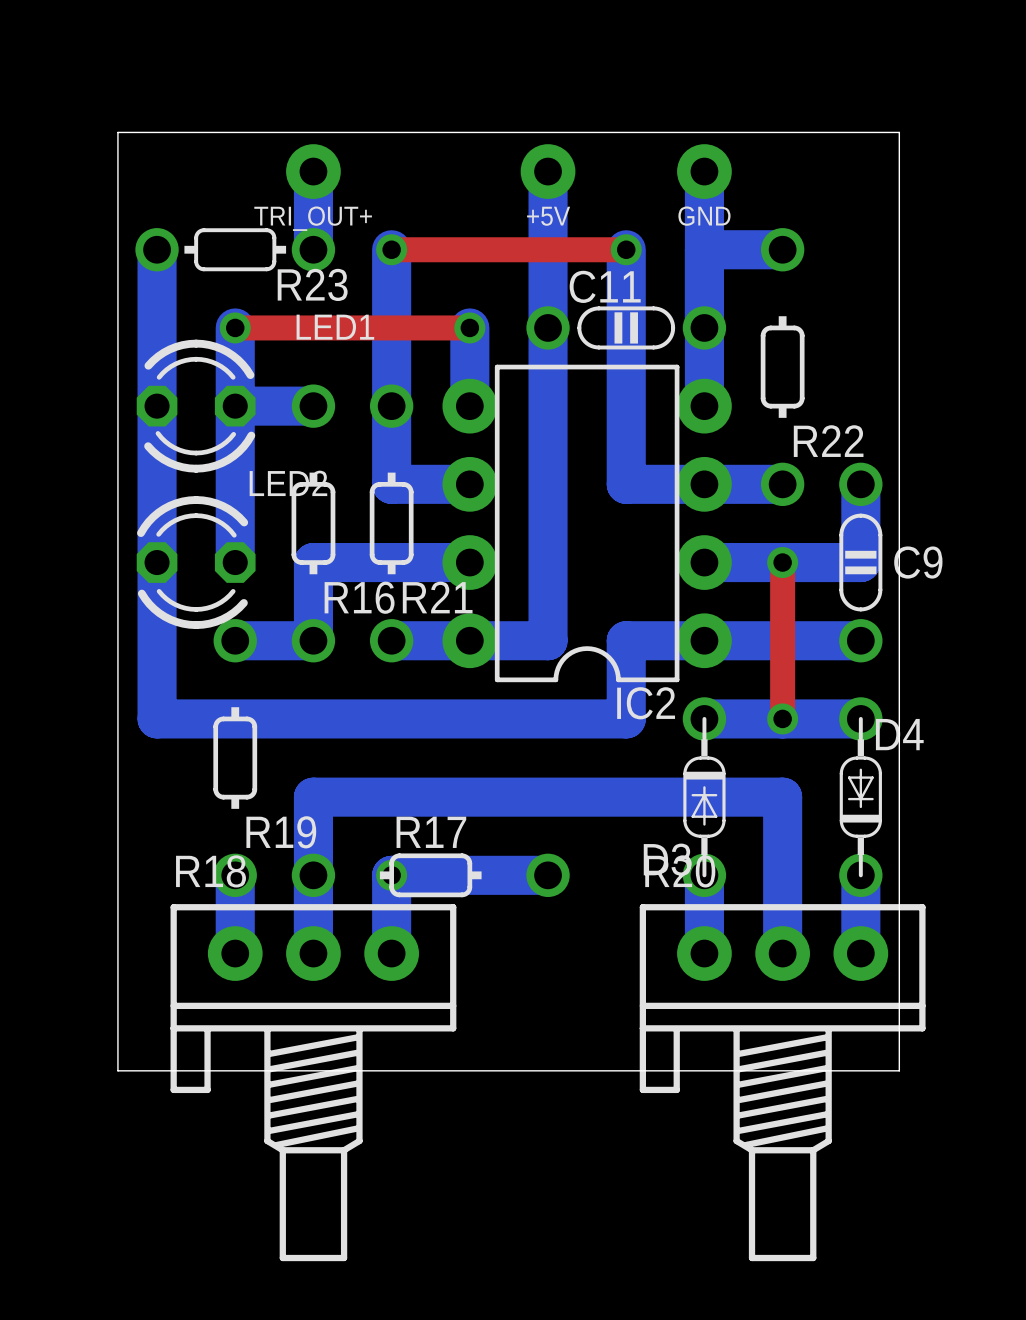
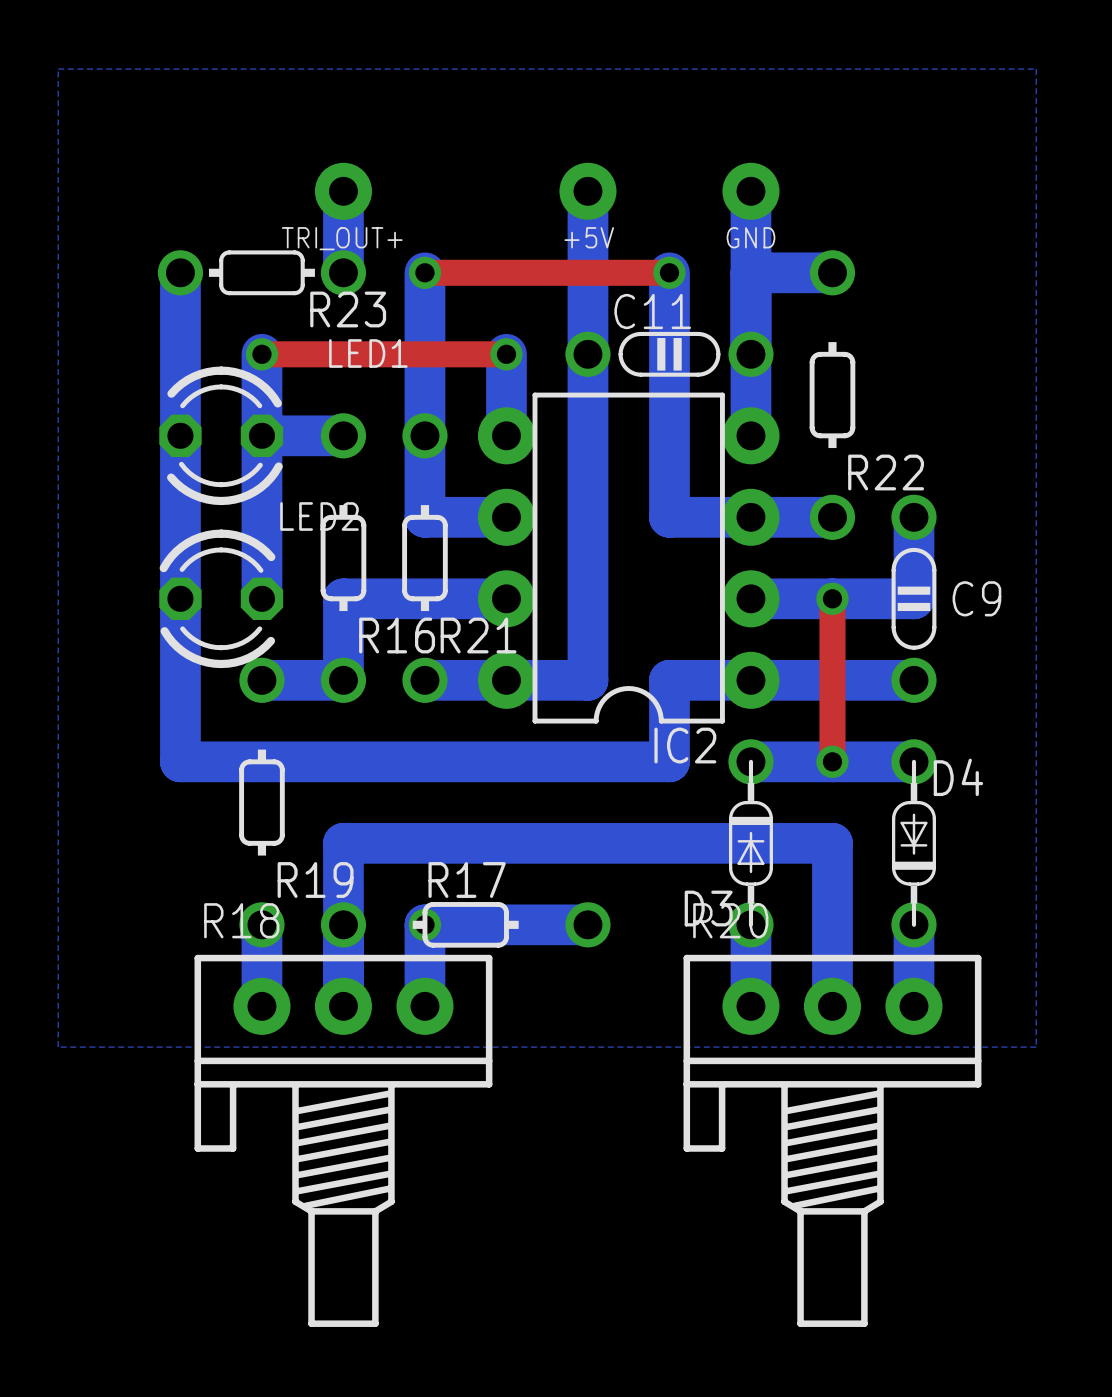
bottom zone outline: none -> (58, 69) (58, 1047) (1036, 1047) (1036, 69) (58, 69)
board edge: (117, 132) (899, 132) (899, 1070) (117, 1070) (117, 132) -> none

